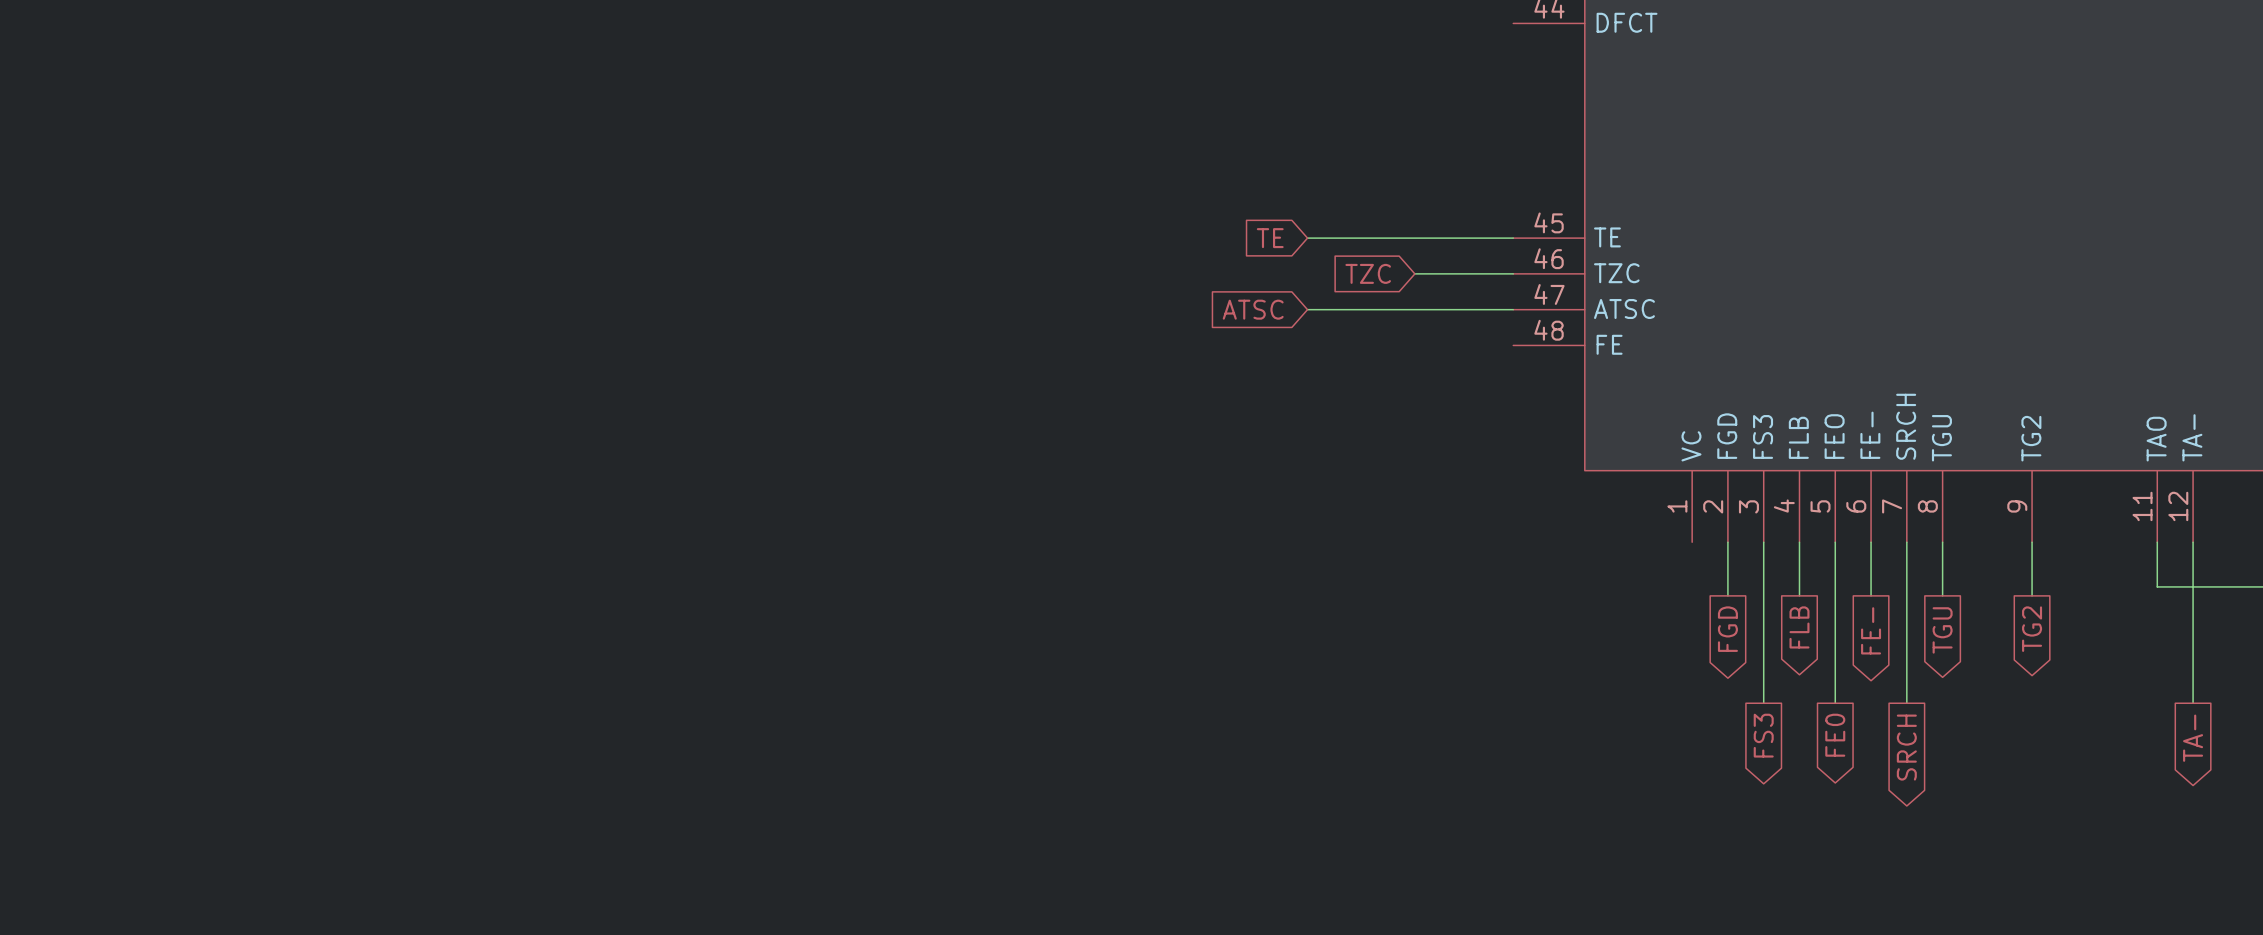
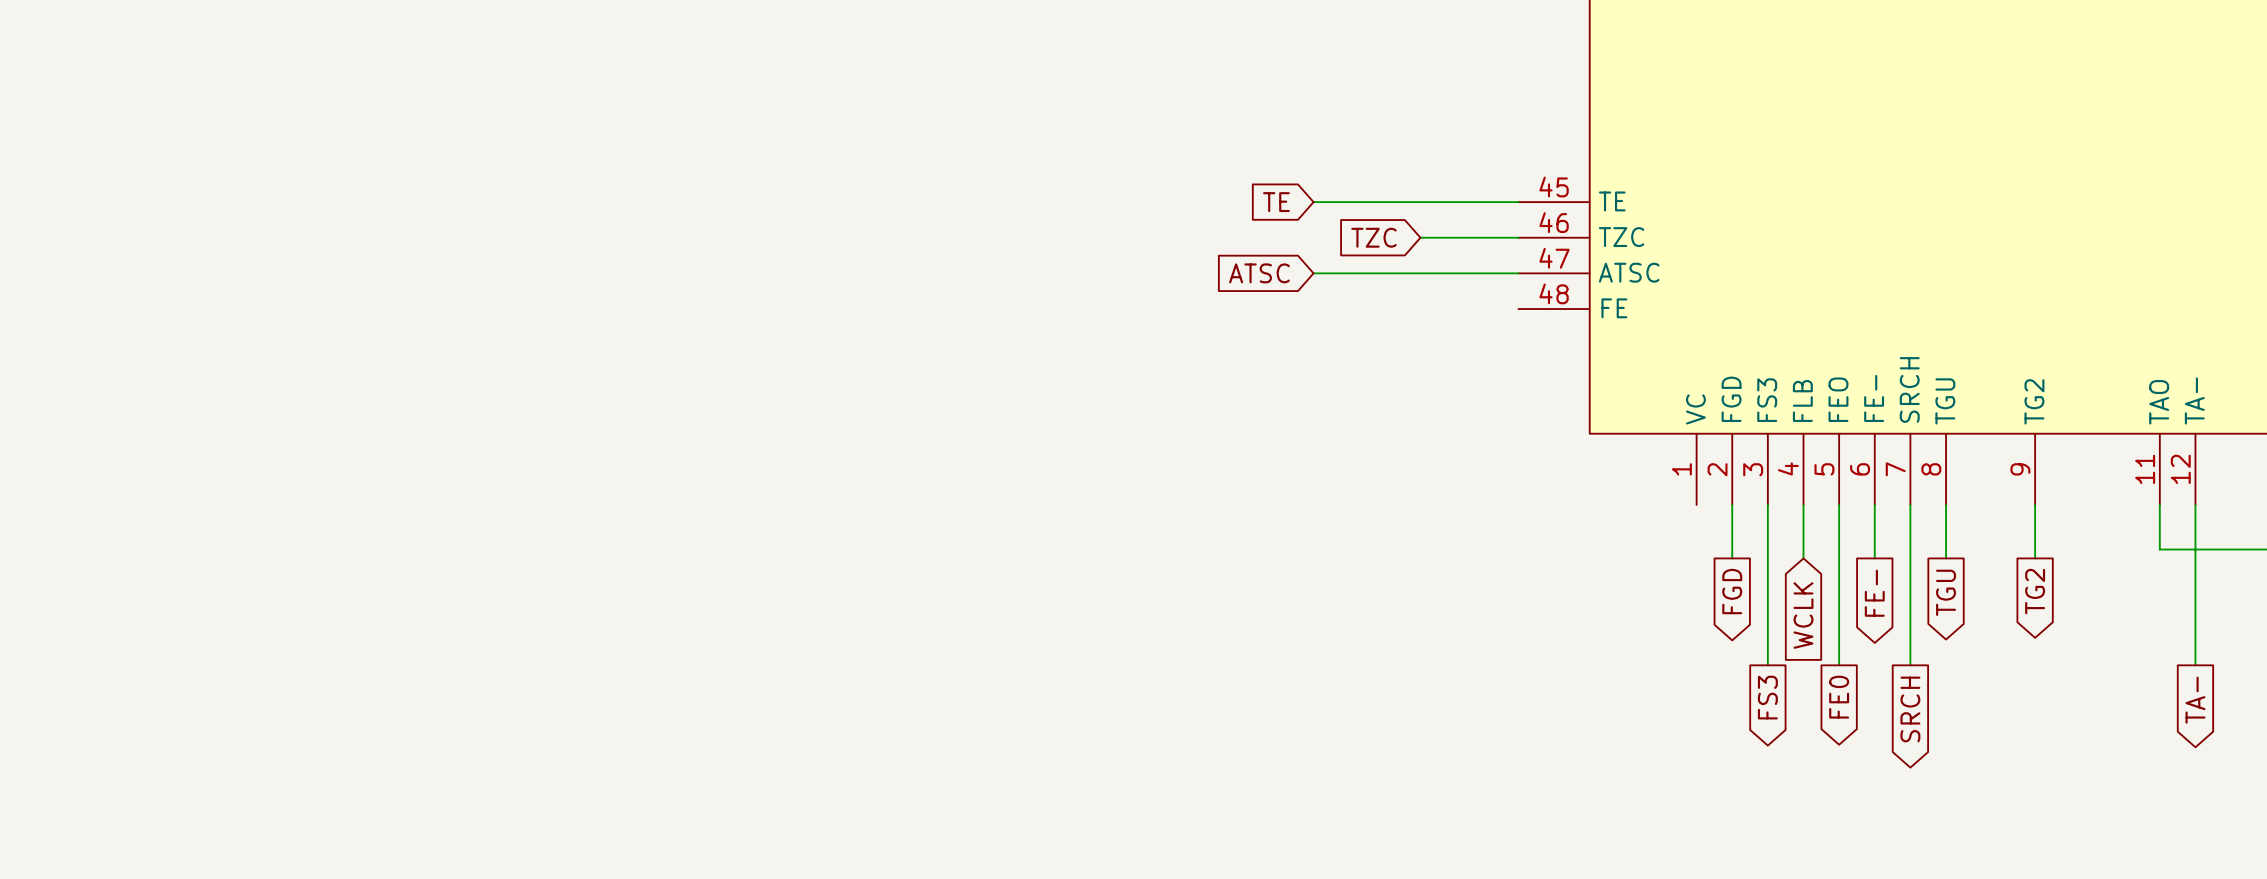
global label shape: output (1799, 627) -> input (1803, 615)
global label: FLB (1799, 627) -> WCLK (1803, 615)

